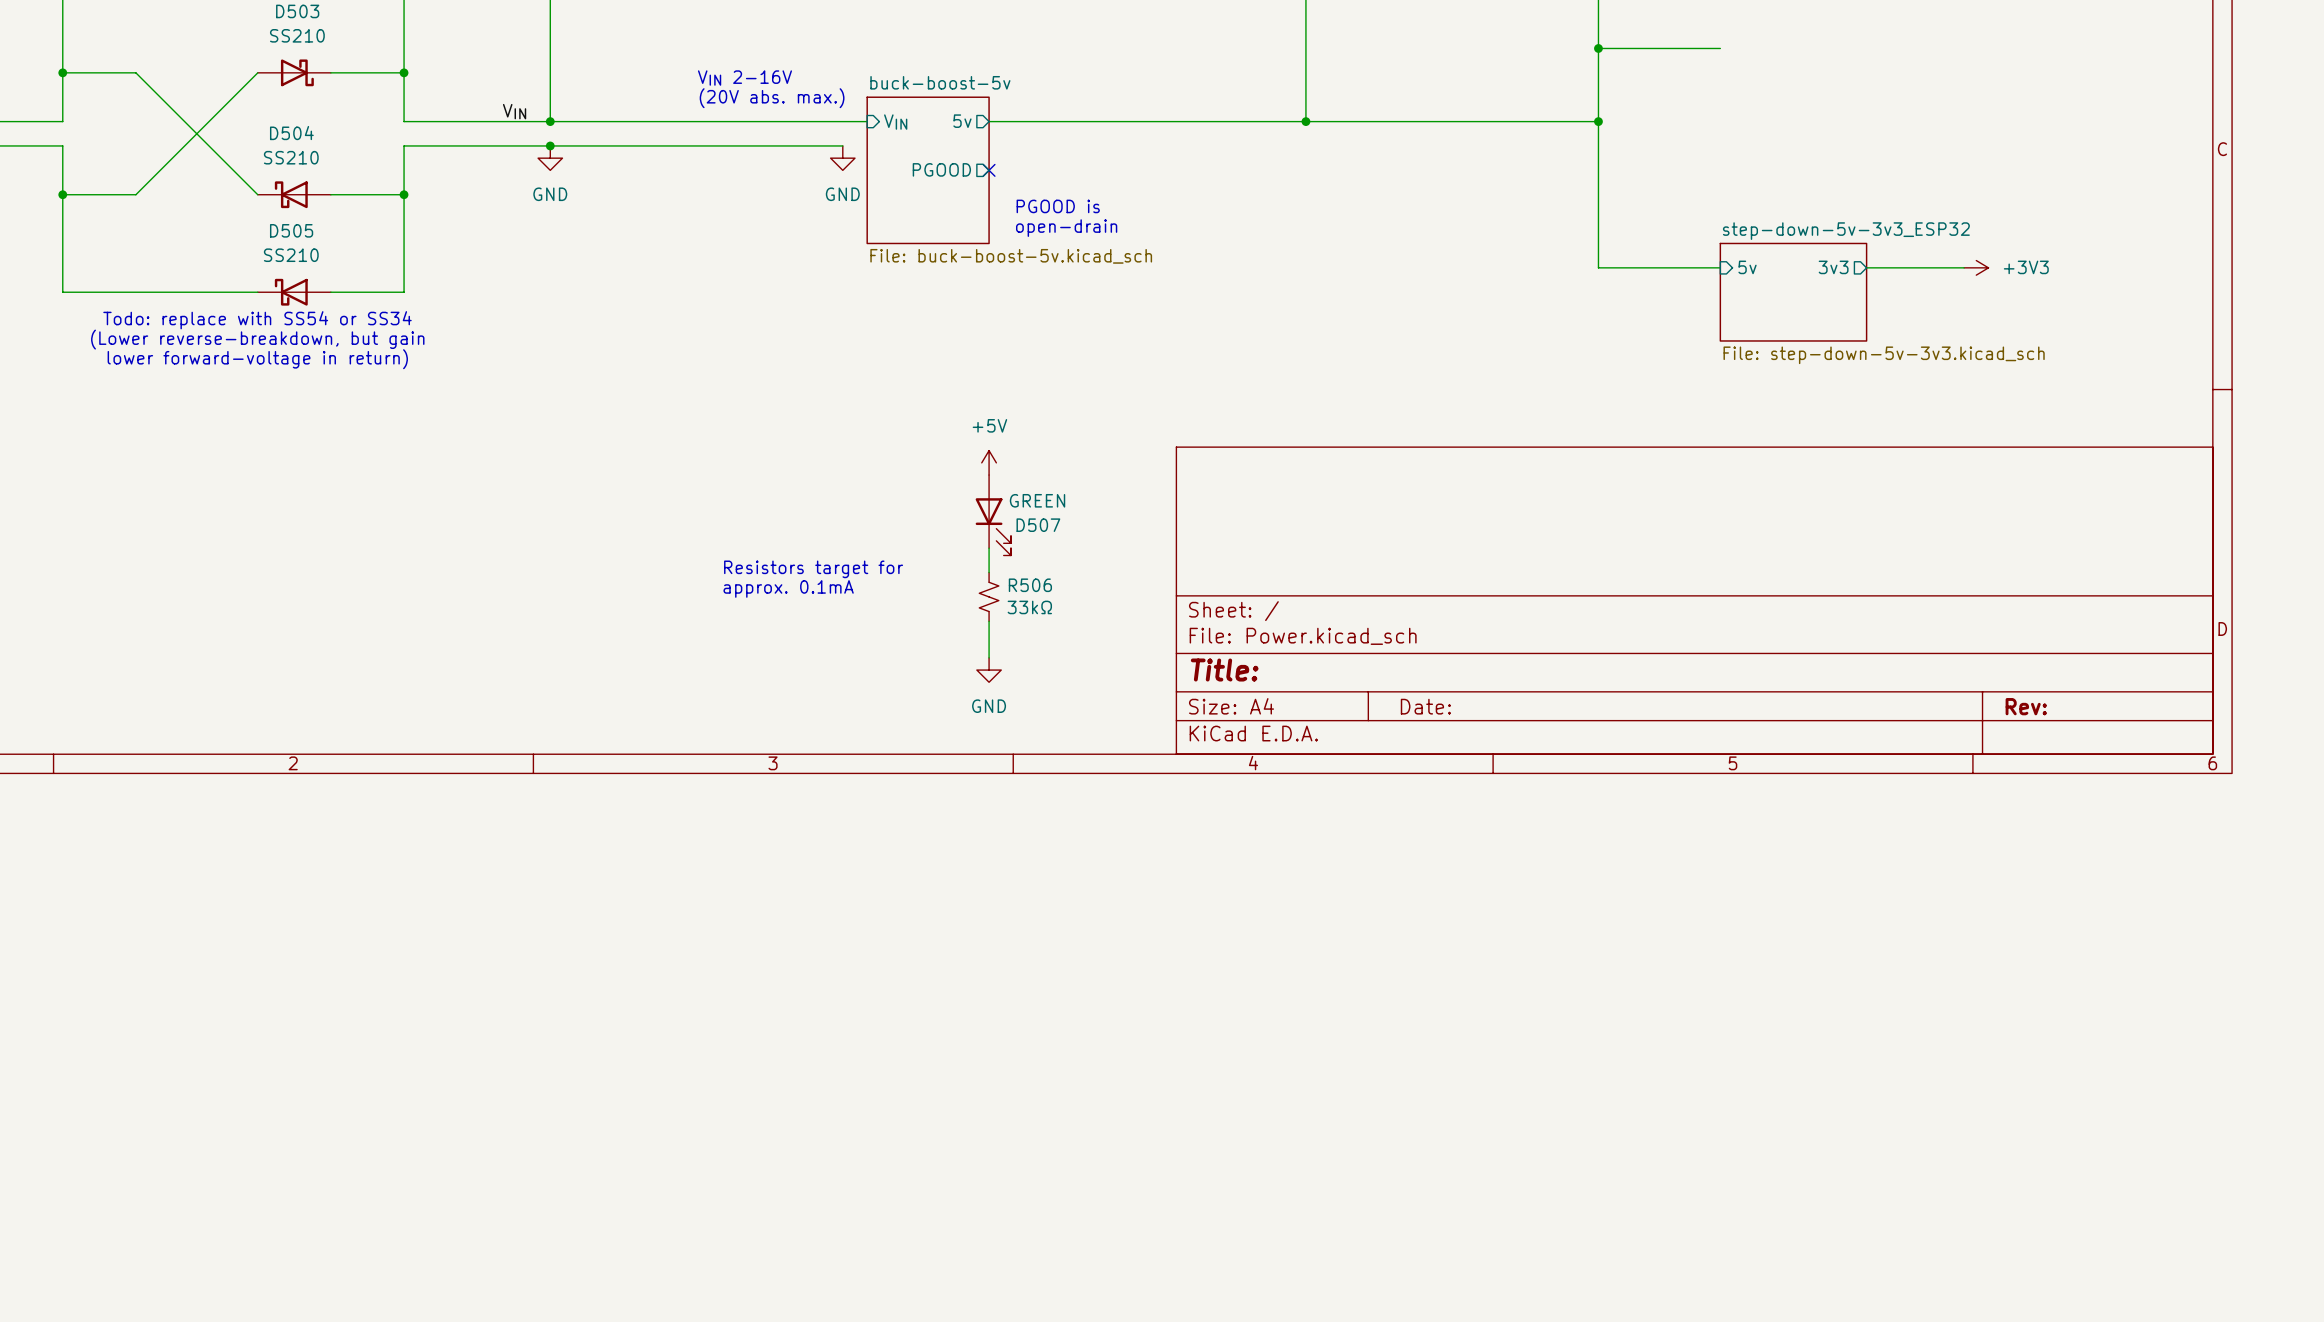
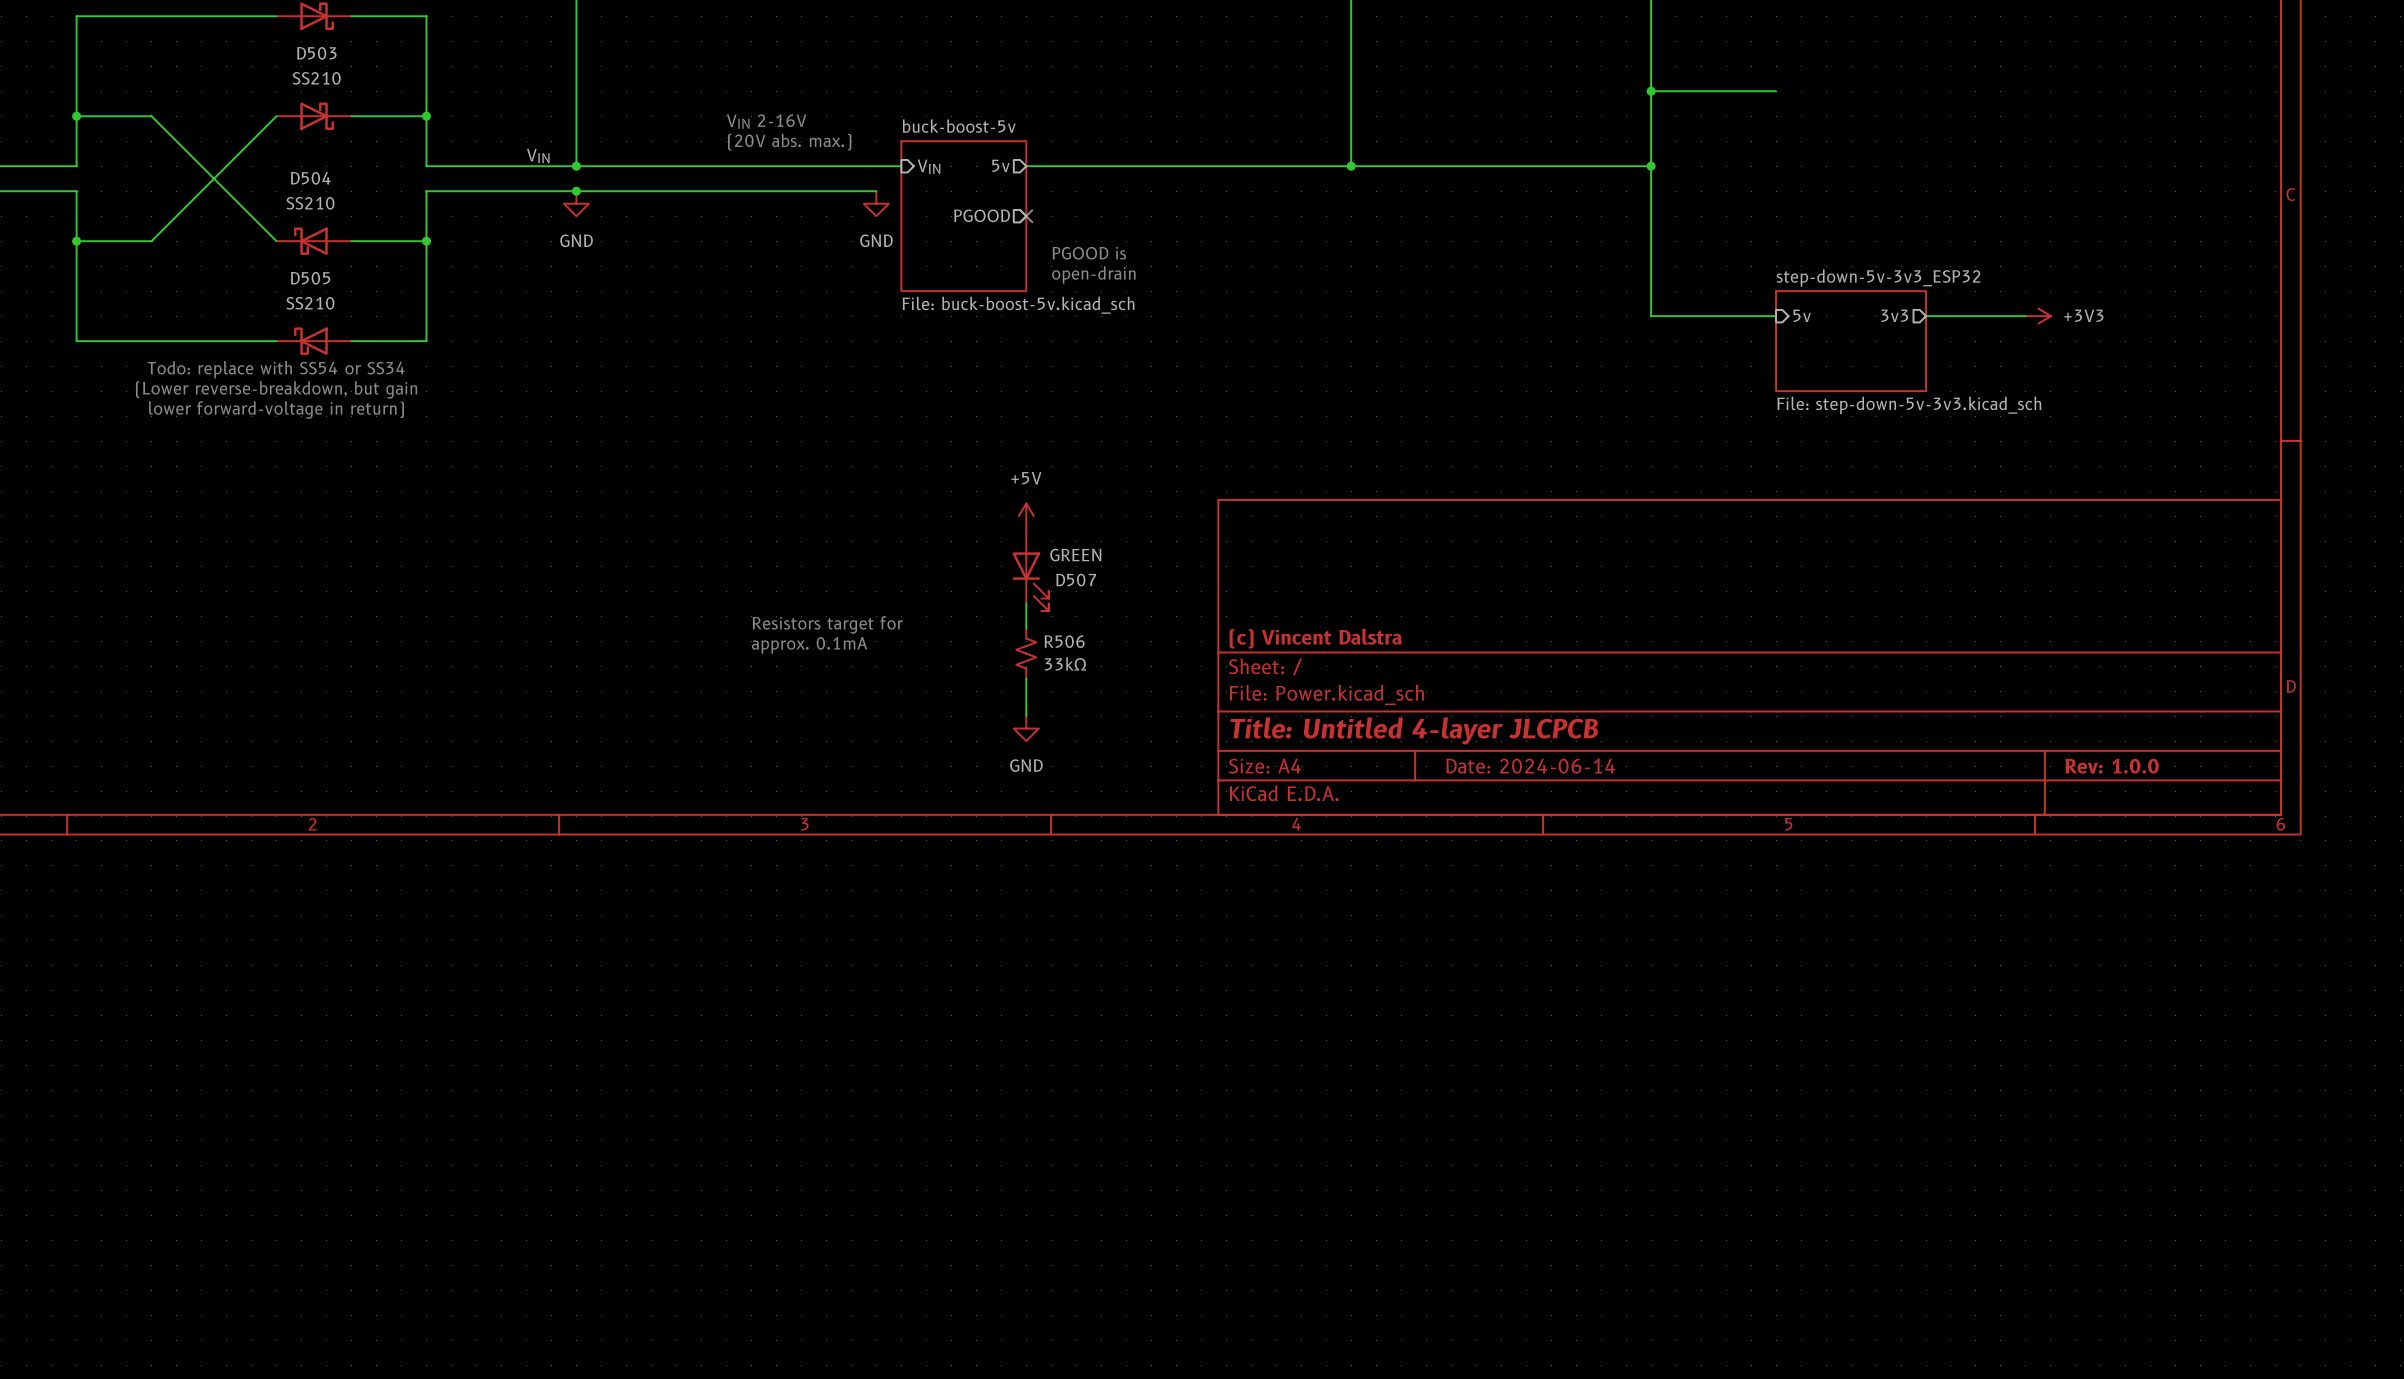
title block: none -> (c) Vincent Dalstra (1315, 638)
title block: Title: (1224, 670) -> Title: Untitled 4-layer JLCPCB (1414, 730)
title block: Date: (1425, 706) -> Date: 2024-06-14 (1530, 766)
title block: Rev: (2026, 706) -> Rev: 1.0.0 (2112, 766)

